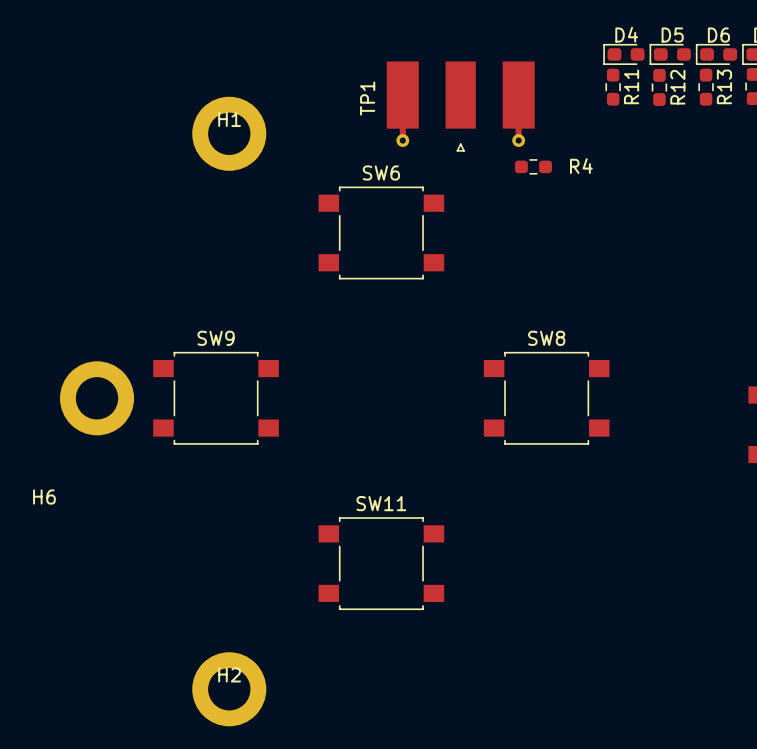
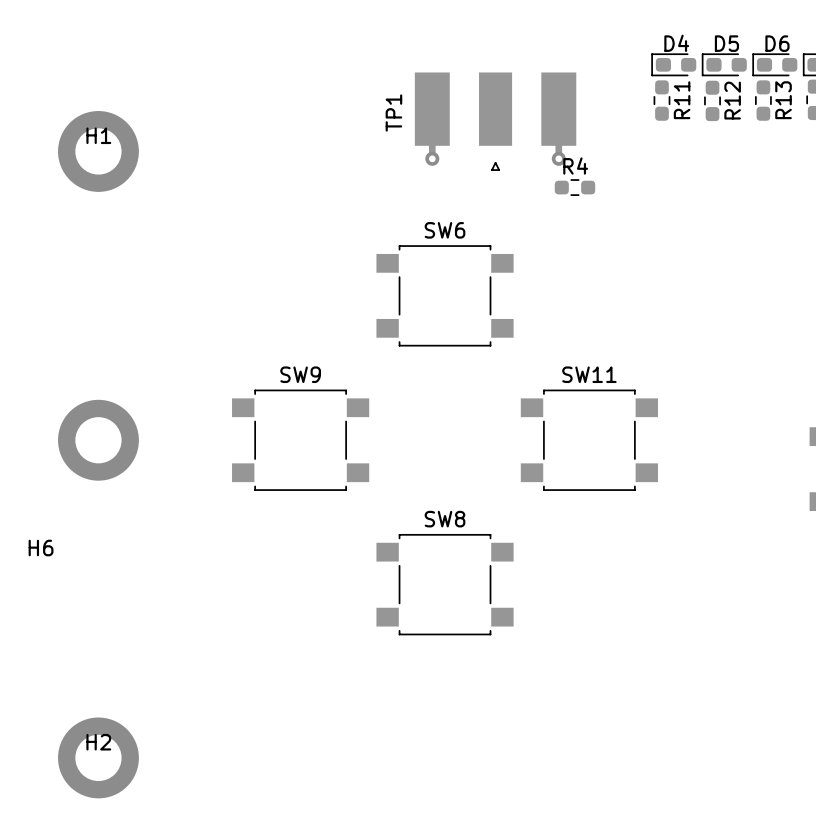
H1 position: (229, 133) -> (98, 151)
R4 name position: R4 (581, 166) -> R4 (575, 166)
SW6 position: (381, 232) -> (445, 295)
SW8 name: SW8 (546, 338) -> SW11 (589, 374)
SW9 position: (216, 398) -> (300, 440)
SW8: none -> (445, 584)
SW11: (381, 563) -> none
H2 position: (229, 689) -> (98, 757)

